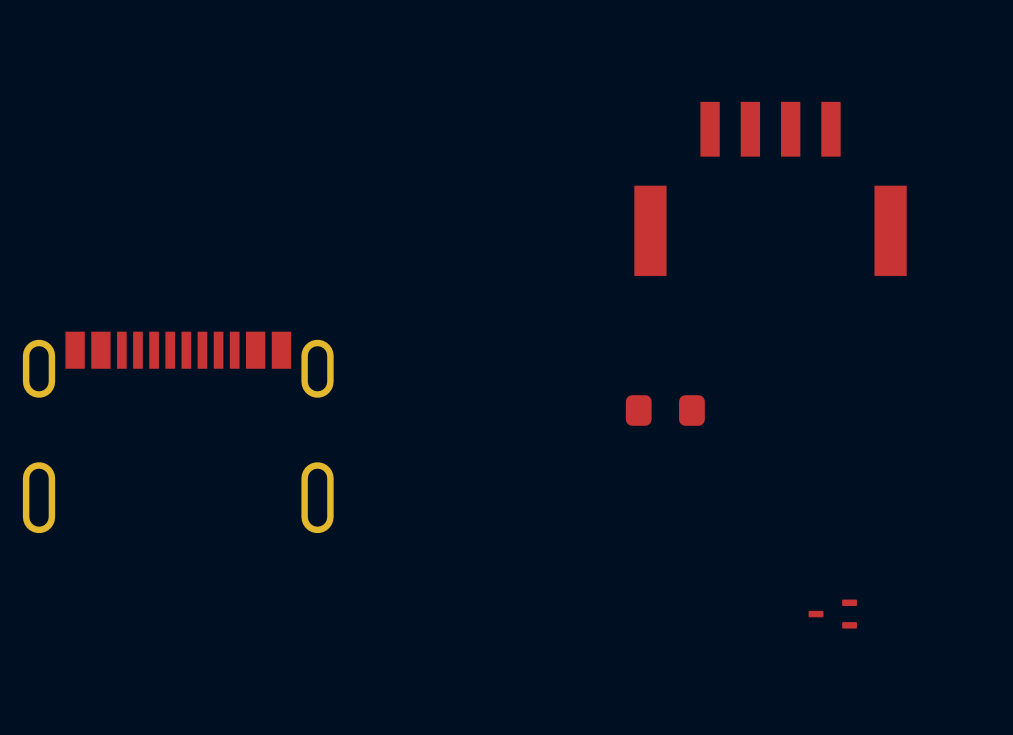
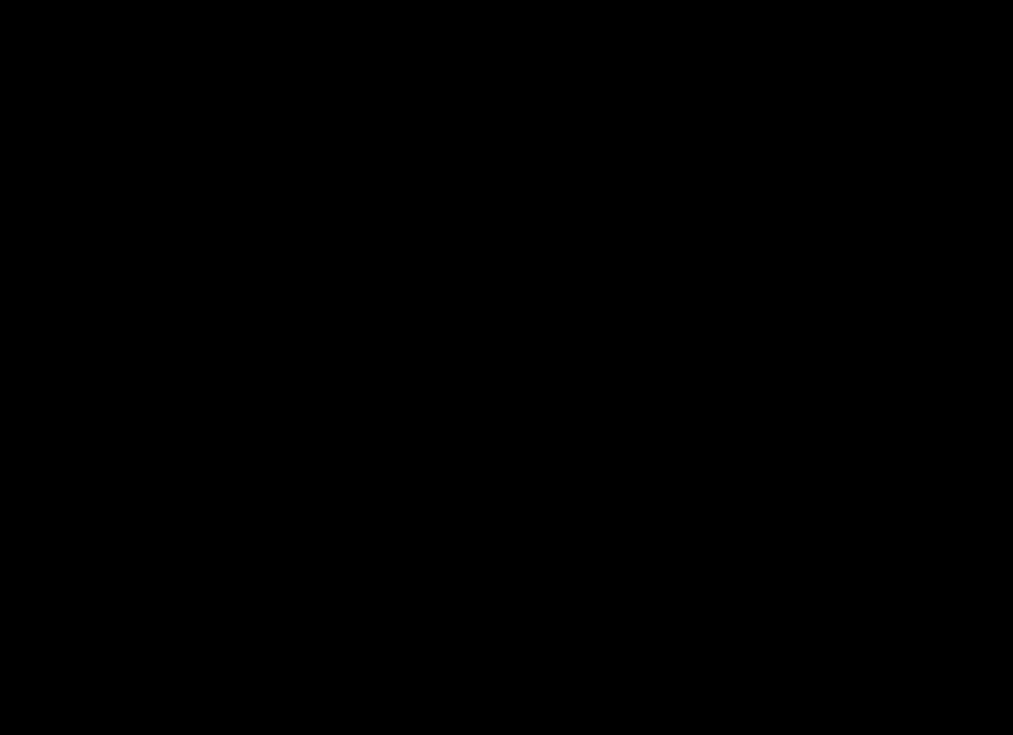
part: (770, 188) -> none
part: (665, 410) -> none
part: (178, 432) -> none
part: (832, 614) -> none

